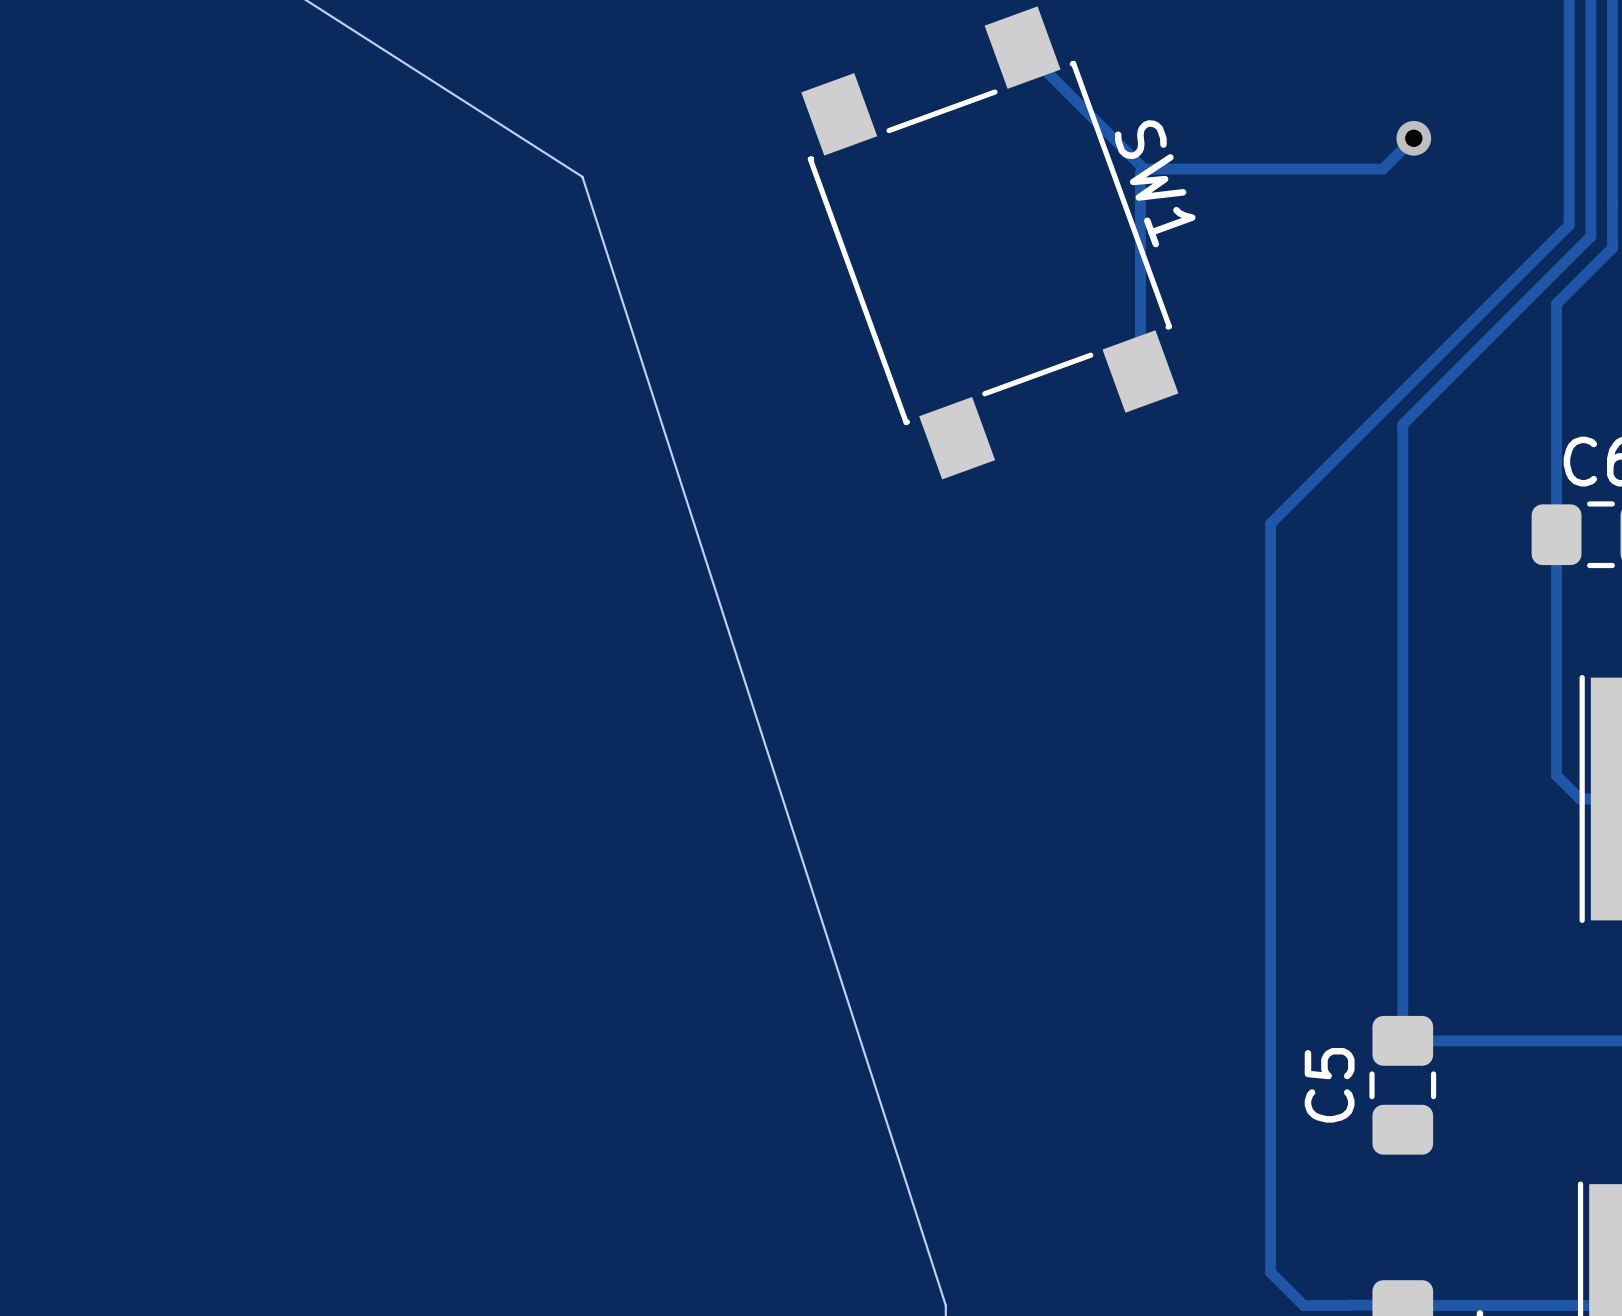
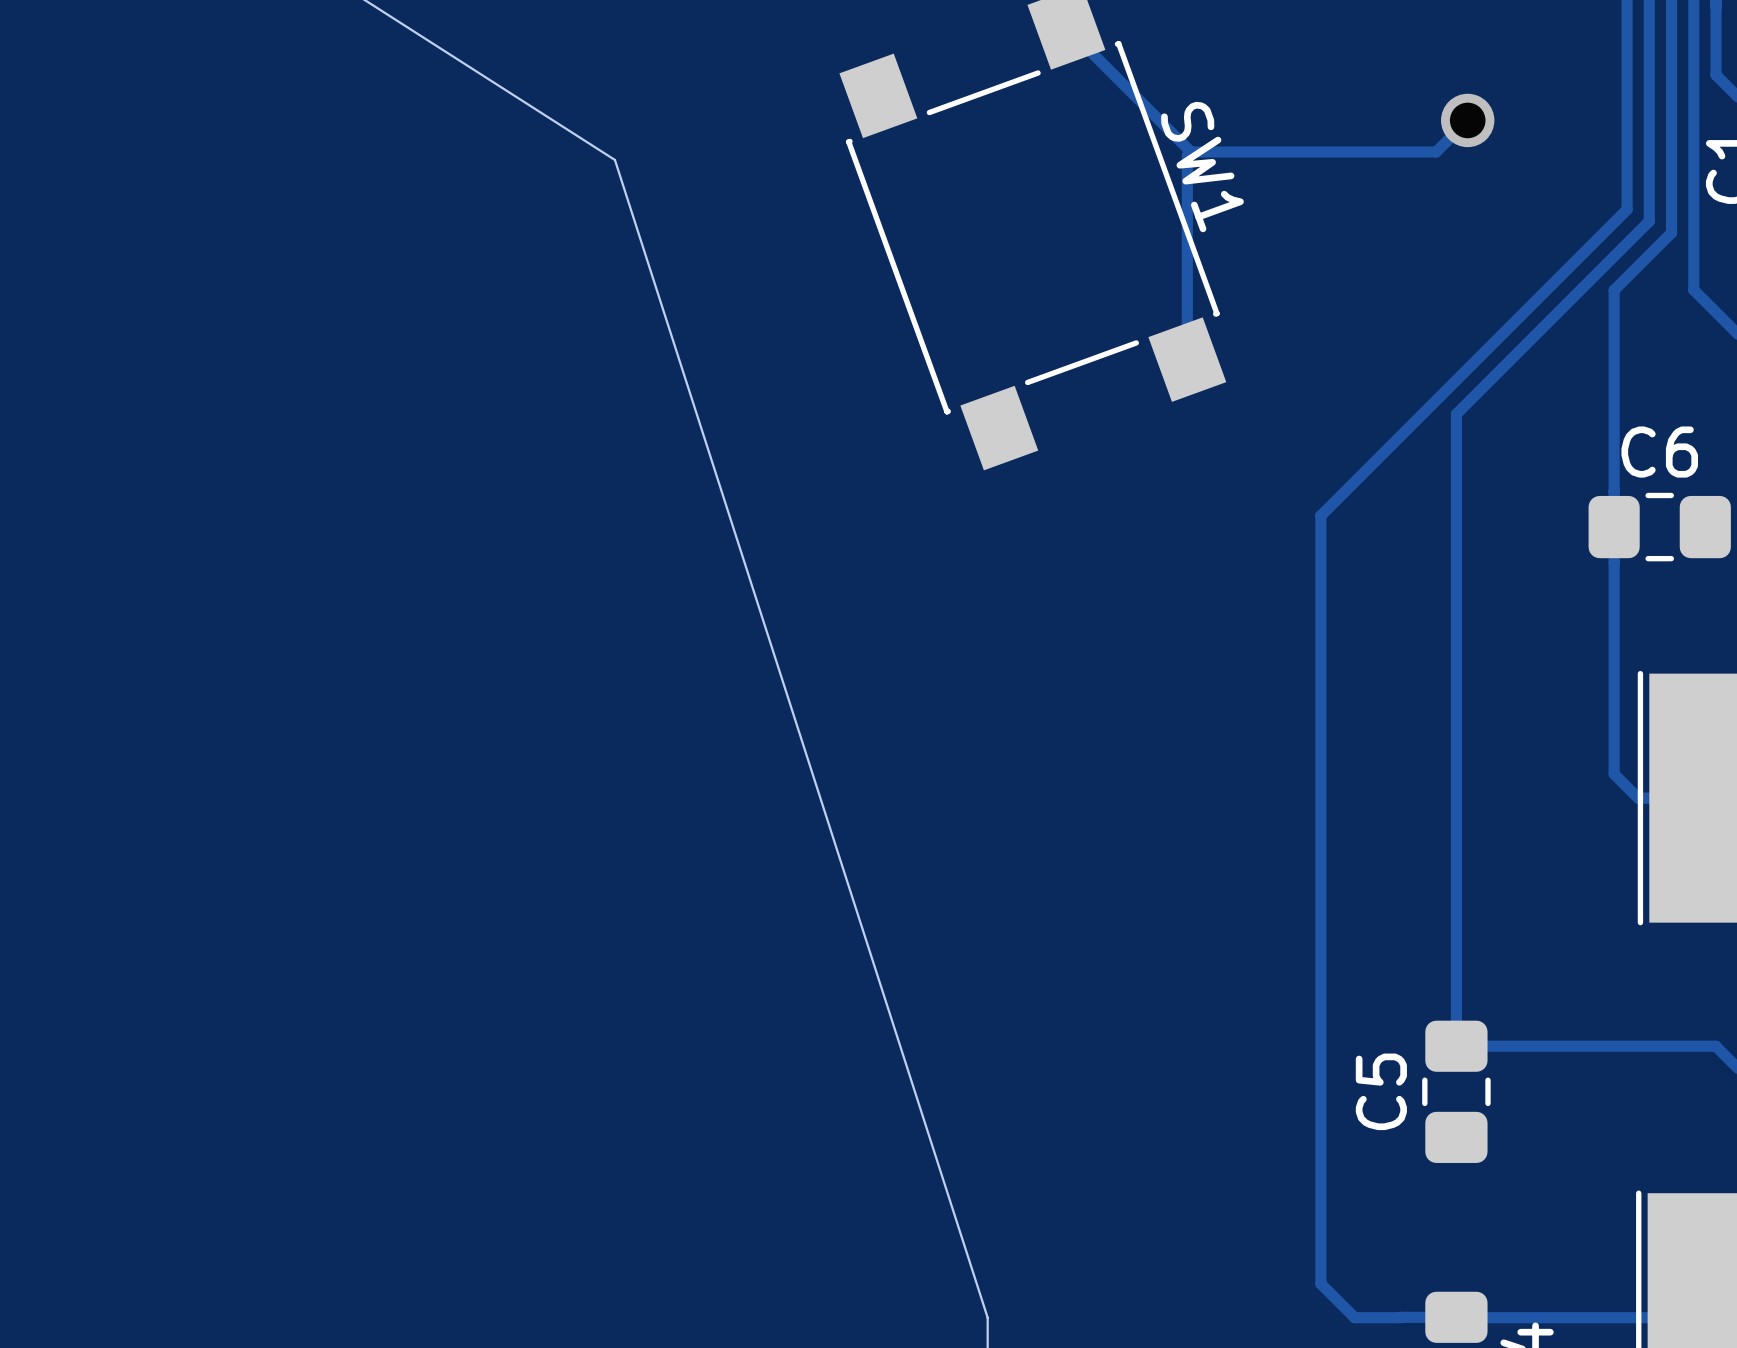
via size: [1396, 120, 1432, 156] -> [1441, 93, 1495, 148]

